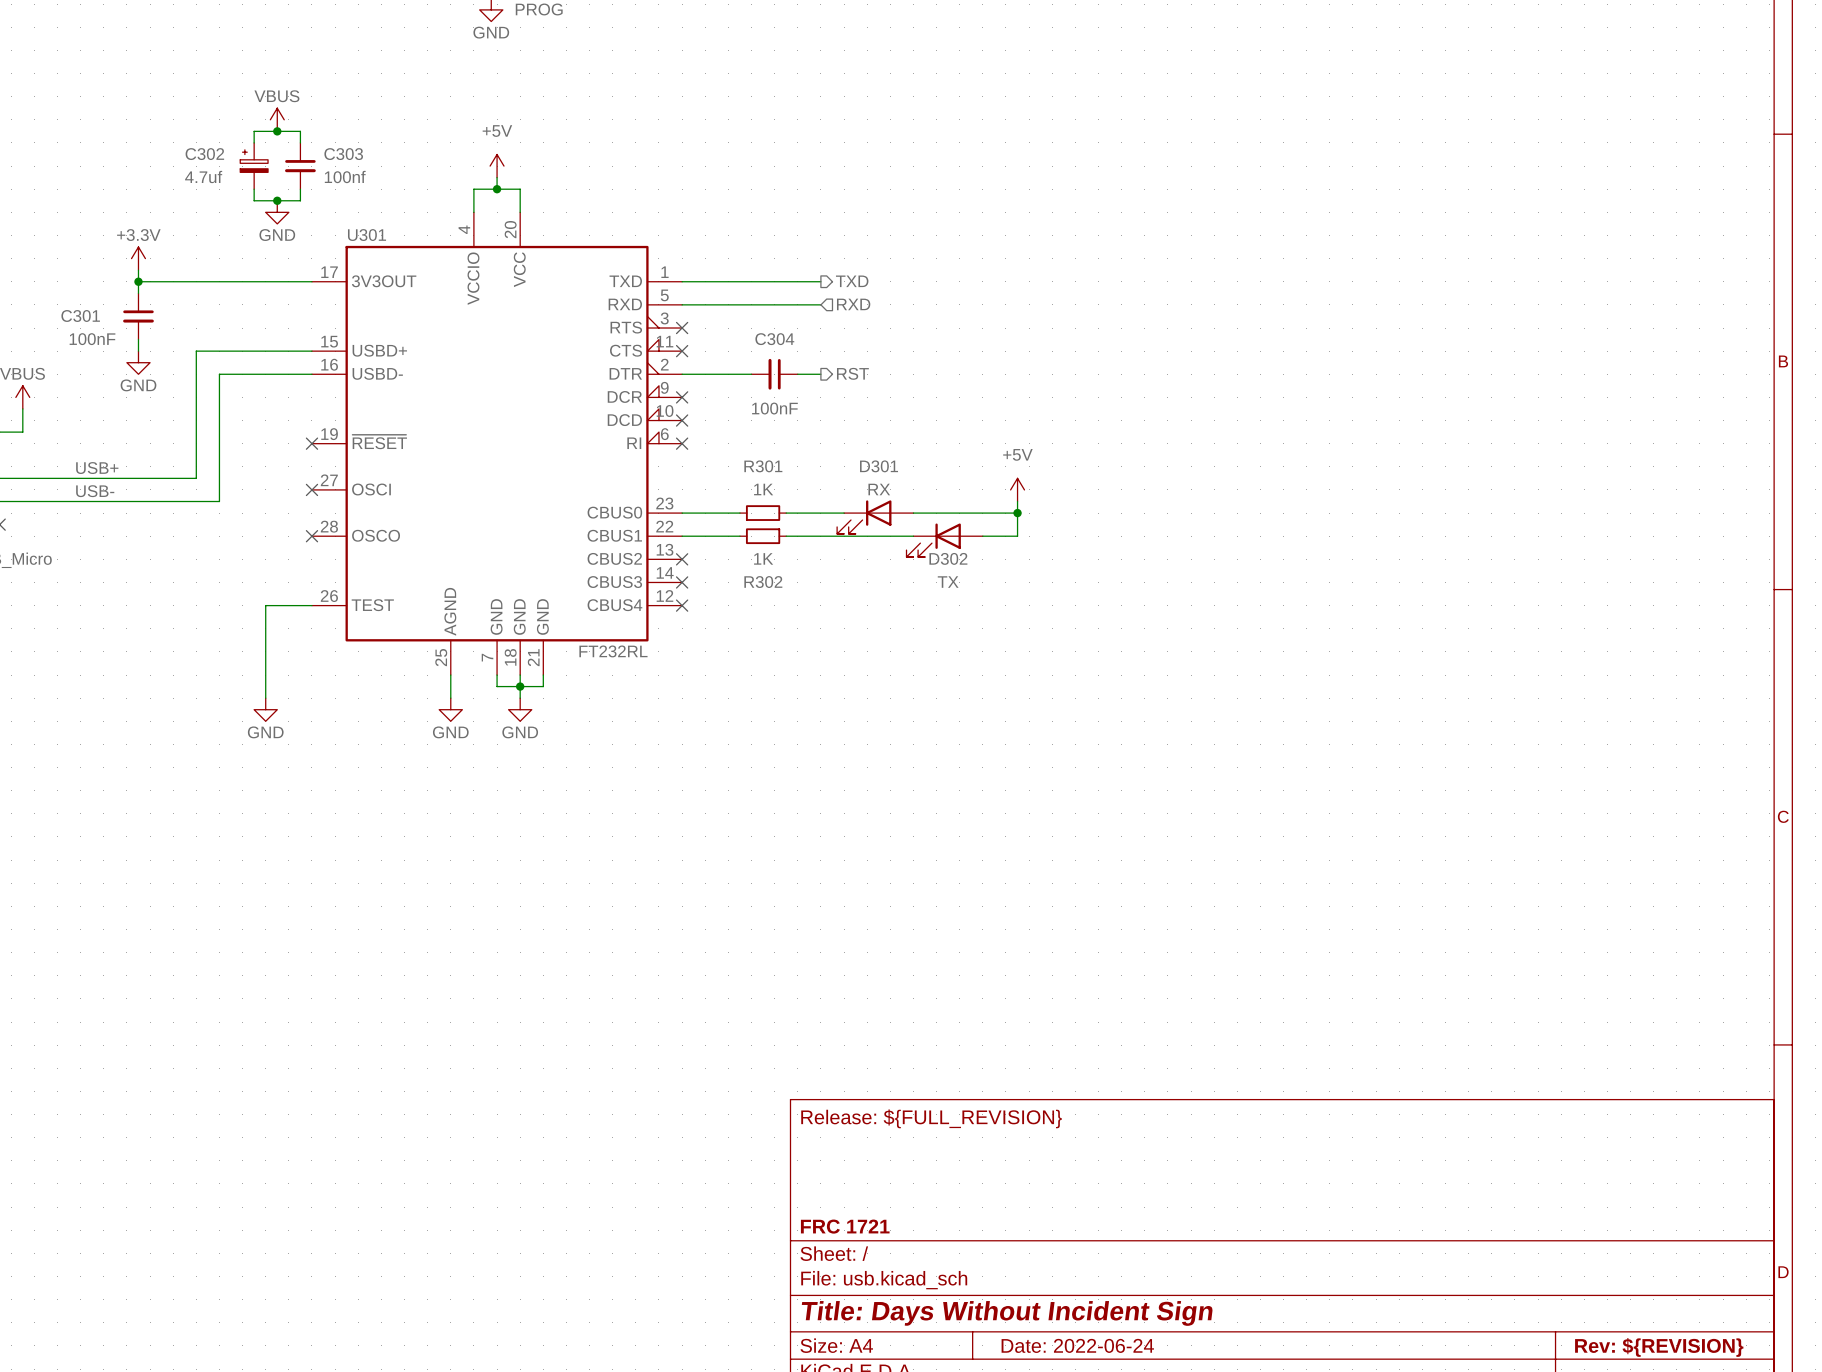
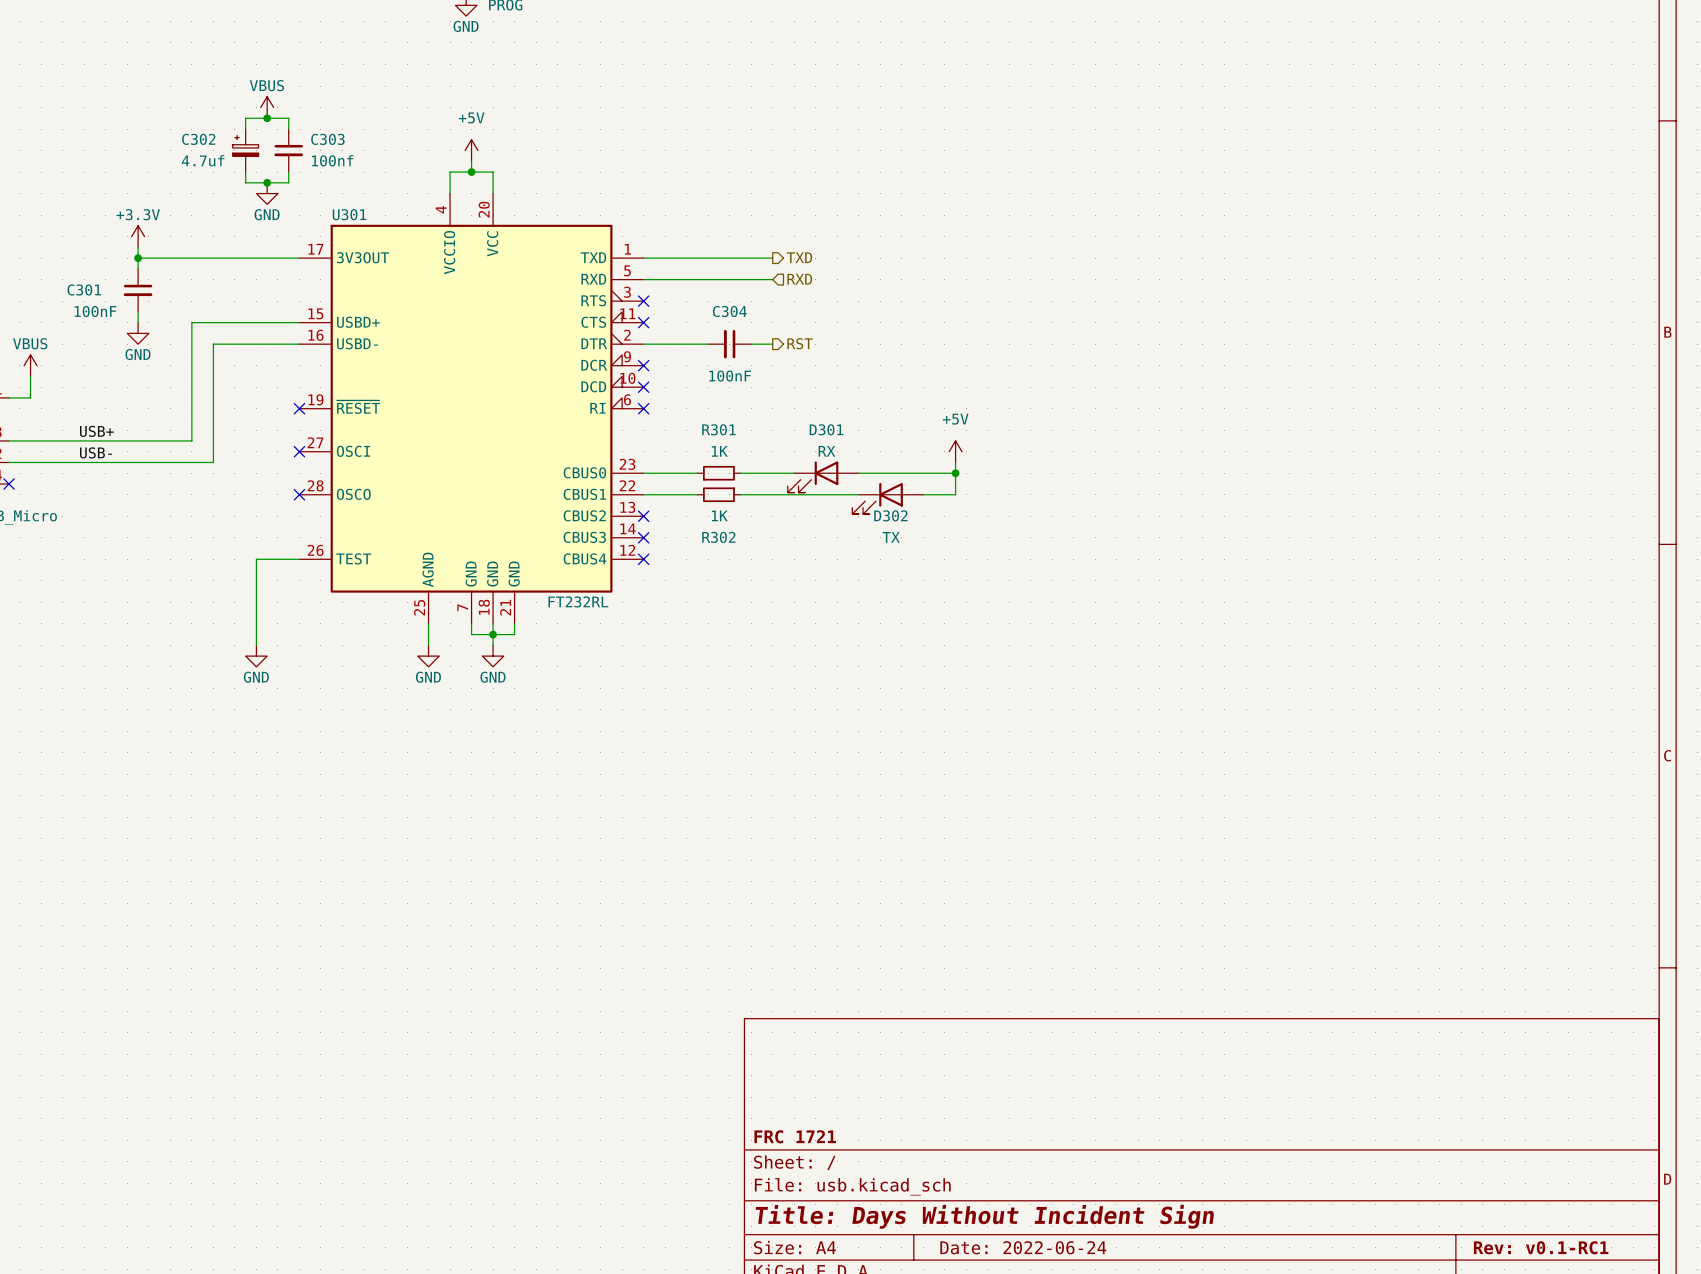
title block: Release: ${FULL_REVISION} (931, 1118) -> none
title block: Rev: ${REVISION} (1659, 1347) -> Rev: v0.1-RC1 (1541, 1247)

